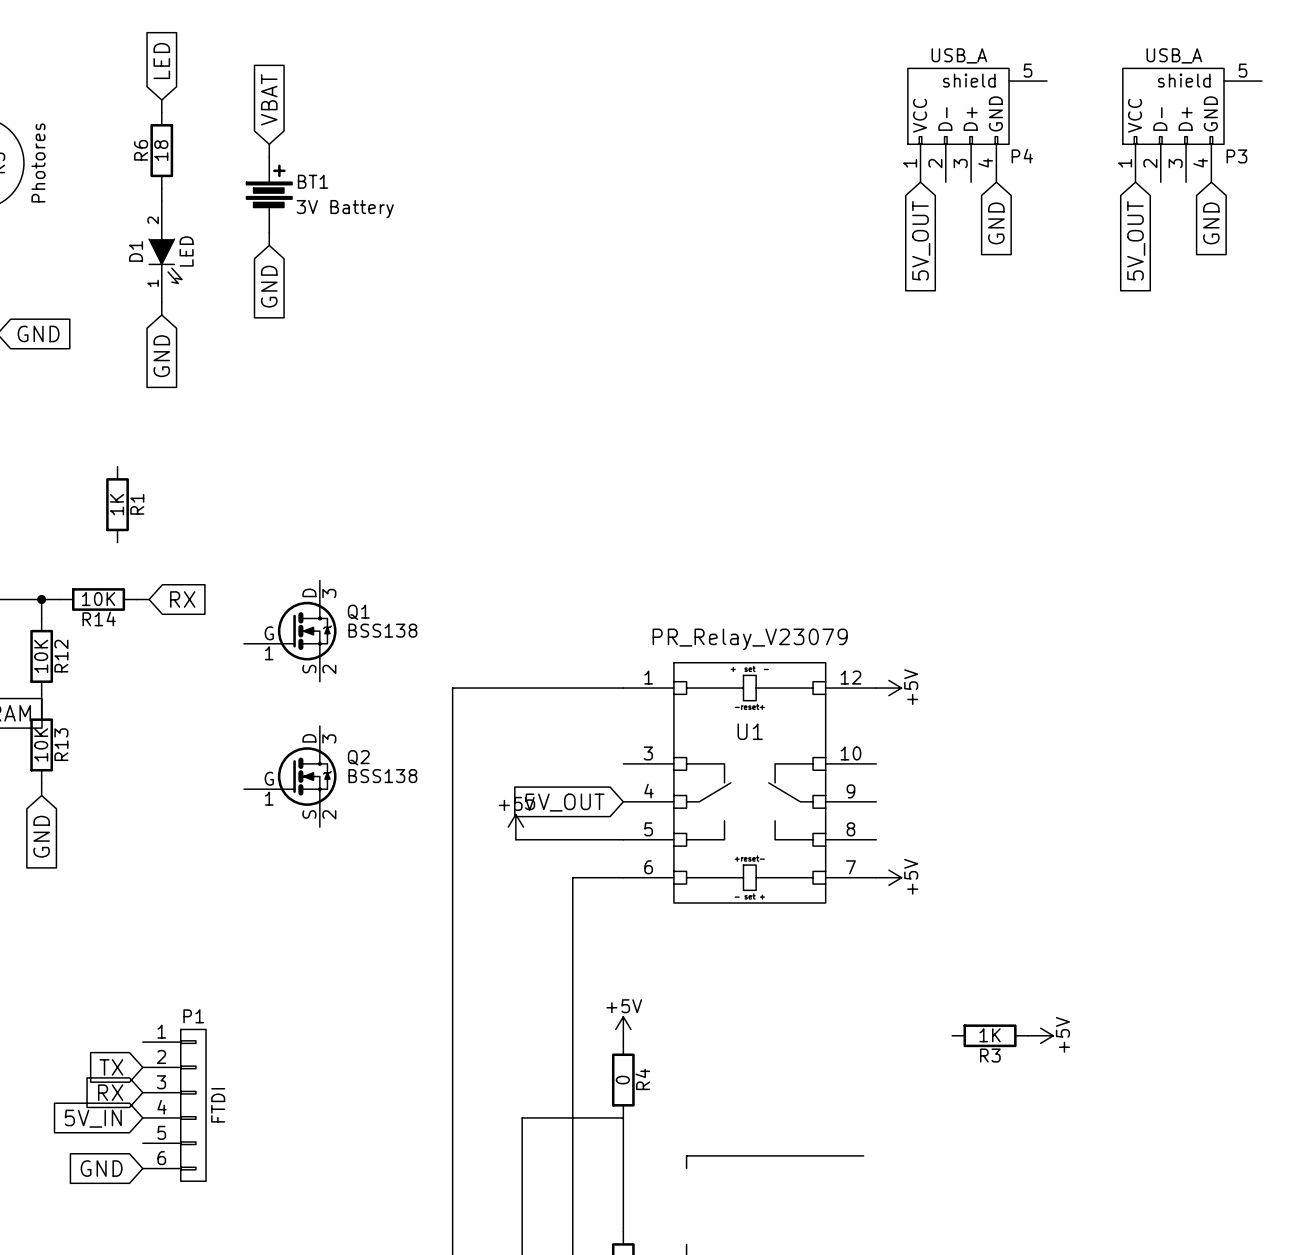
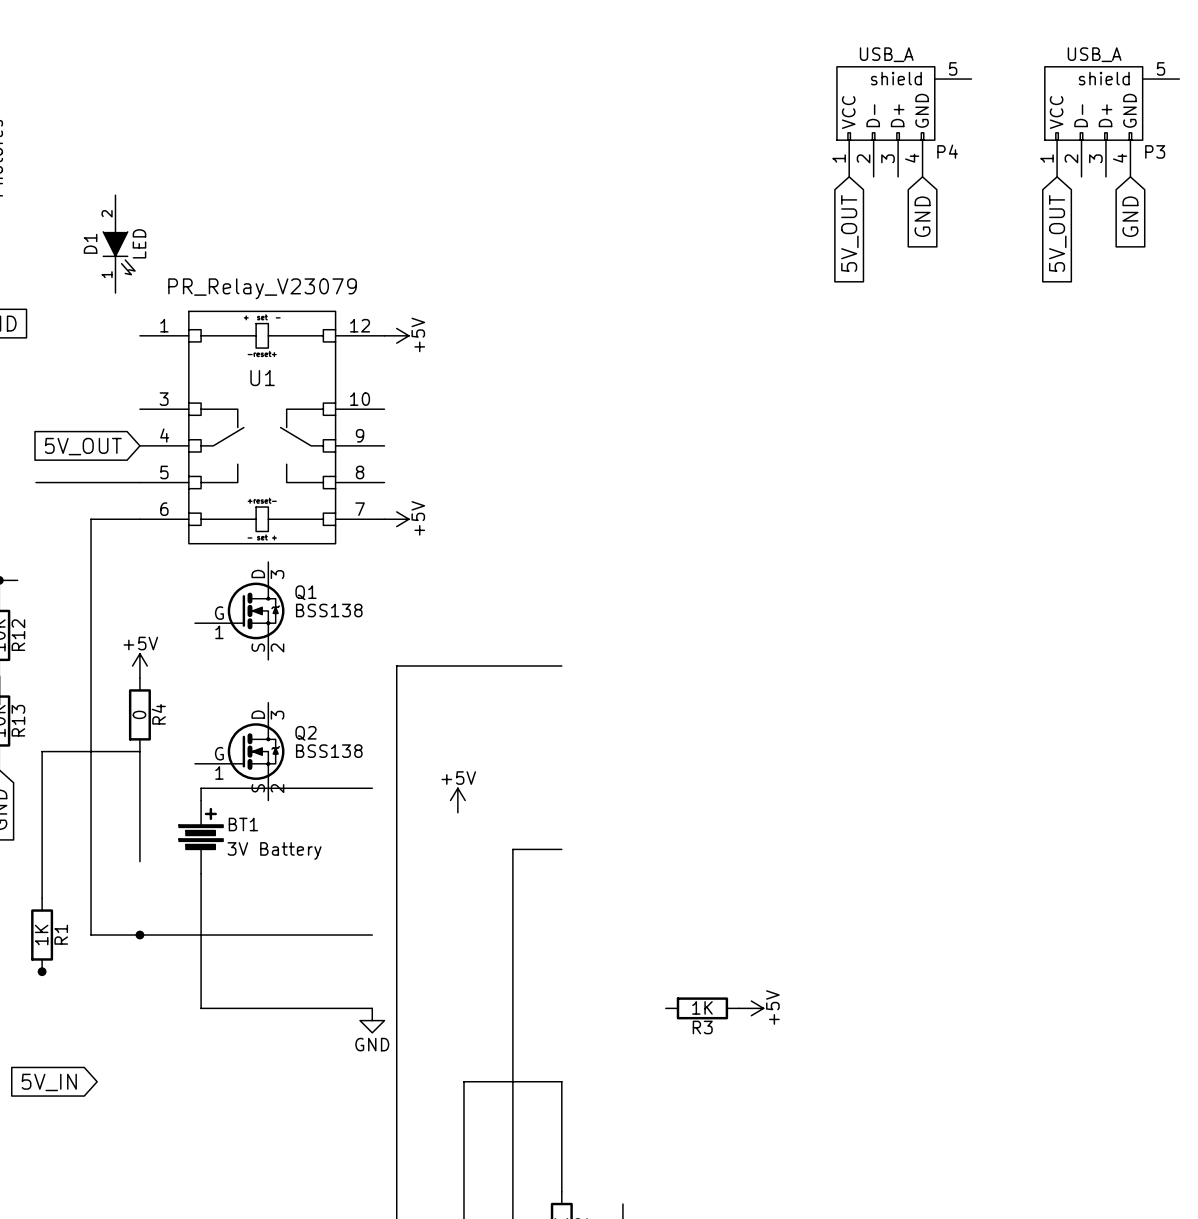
global label: LED (161, 60) -> none
global label: VBAT (269, 99) -> none
wire: (161, 100) (161, 112) -> none
wire: (269, 144) (269, 156) -> none
R6: 18 (161, 150) -> none
wire: (161, 188) (161, 201) -> none
BT1 position: (269, 194) -> (201, 837)
wire: (269, 232) (269, 245) -> none
global label: GND (269, 286) -> none
wire: (161, 302) (161, 314) -> none
power symbol: none -> +5V (396, 335)
global label: GND (161, 356) -> none
global label: none -> 5V_OUT (83, 446)
wire: none -> (35, 482) (139, 482)
R1 position: (117, 504) -> (42, 935)
wire: none -> (139, 519) (91, 519) (91, 935) (372, 935)
power symbol: none -> +5V (396, 519)
R14: 10K (98, 599) -> none
wire: (136, 599) (149, 599) -> none
global label: RX (182, 599) -> none
power symbol: none -> +5V (139, 665)
power symbol: +5V (888, 688) -> none
U1 position: (749, 782) -> (262, 427)
global label: 5V_OUT (564, 802) -> none
wire: none -> (372, 788) (201, 788) (201, 800)
wire: (515, 839) (623, 839) -> none
power symbol: +5V (888, 877) -> none
wire: none -> (139, 861) (139, 751) (42, 751) (42, 898)
wire: none -> (201, 873) (201, 1008) (372, 1008)
junction: none -> (139, 935)
junction: none -> (42, 971)
power symbol: +5V (623, 1029) -> none
R3 position: (990, 1035) -> (702, 1008)
power symbol: +5V (1040, 1035) -> none
power symbol: none -> +5V (751, 1008)
power symbol: none -> GND (372, 1020)
global label: TX (111, 1067) -> none
R4 position: (623, 1080) -> (139, 714)
global label: RX (110, 1092) -> none
P1: FTDI (174, 1105) -> none
wire: (863, 1155) (686, 1155) (686, 1168) -> none
global label: GND (101, 1168) -> none

